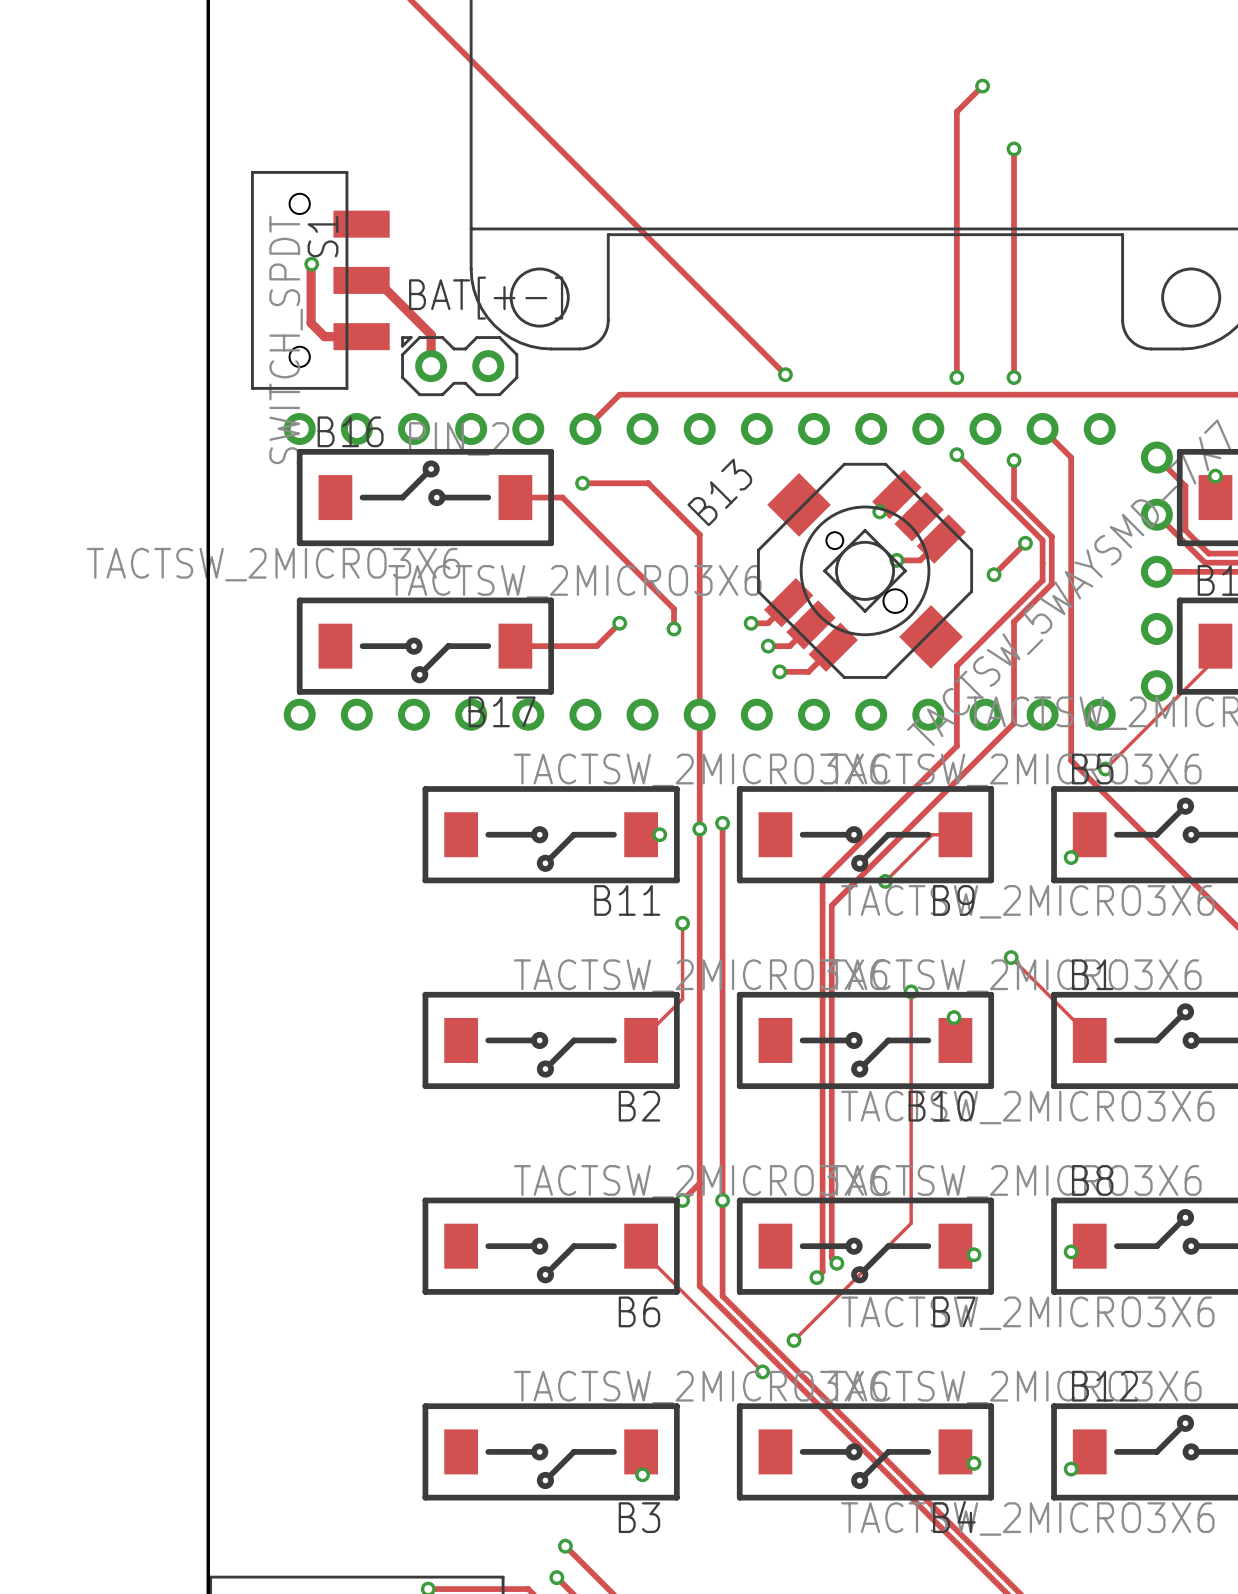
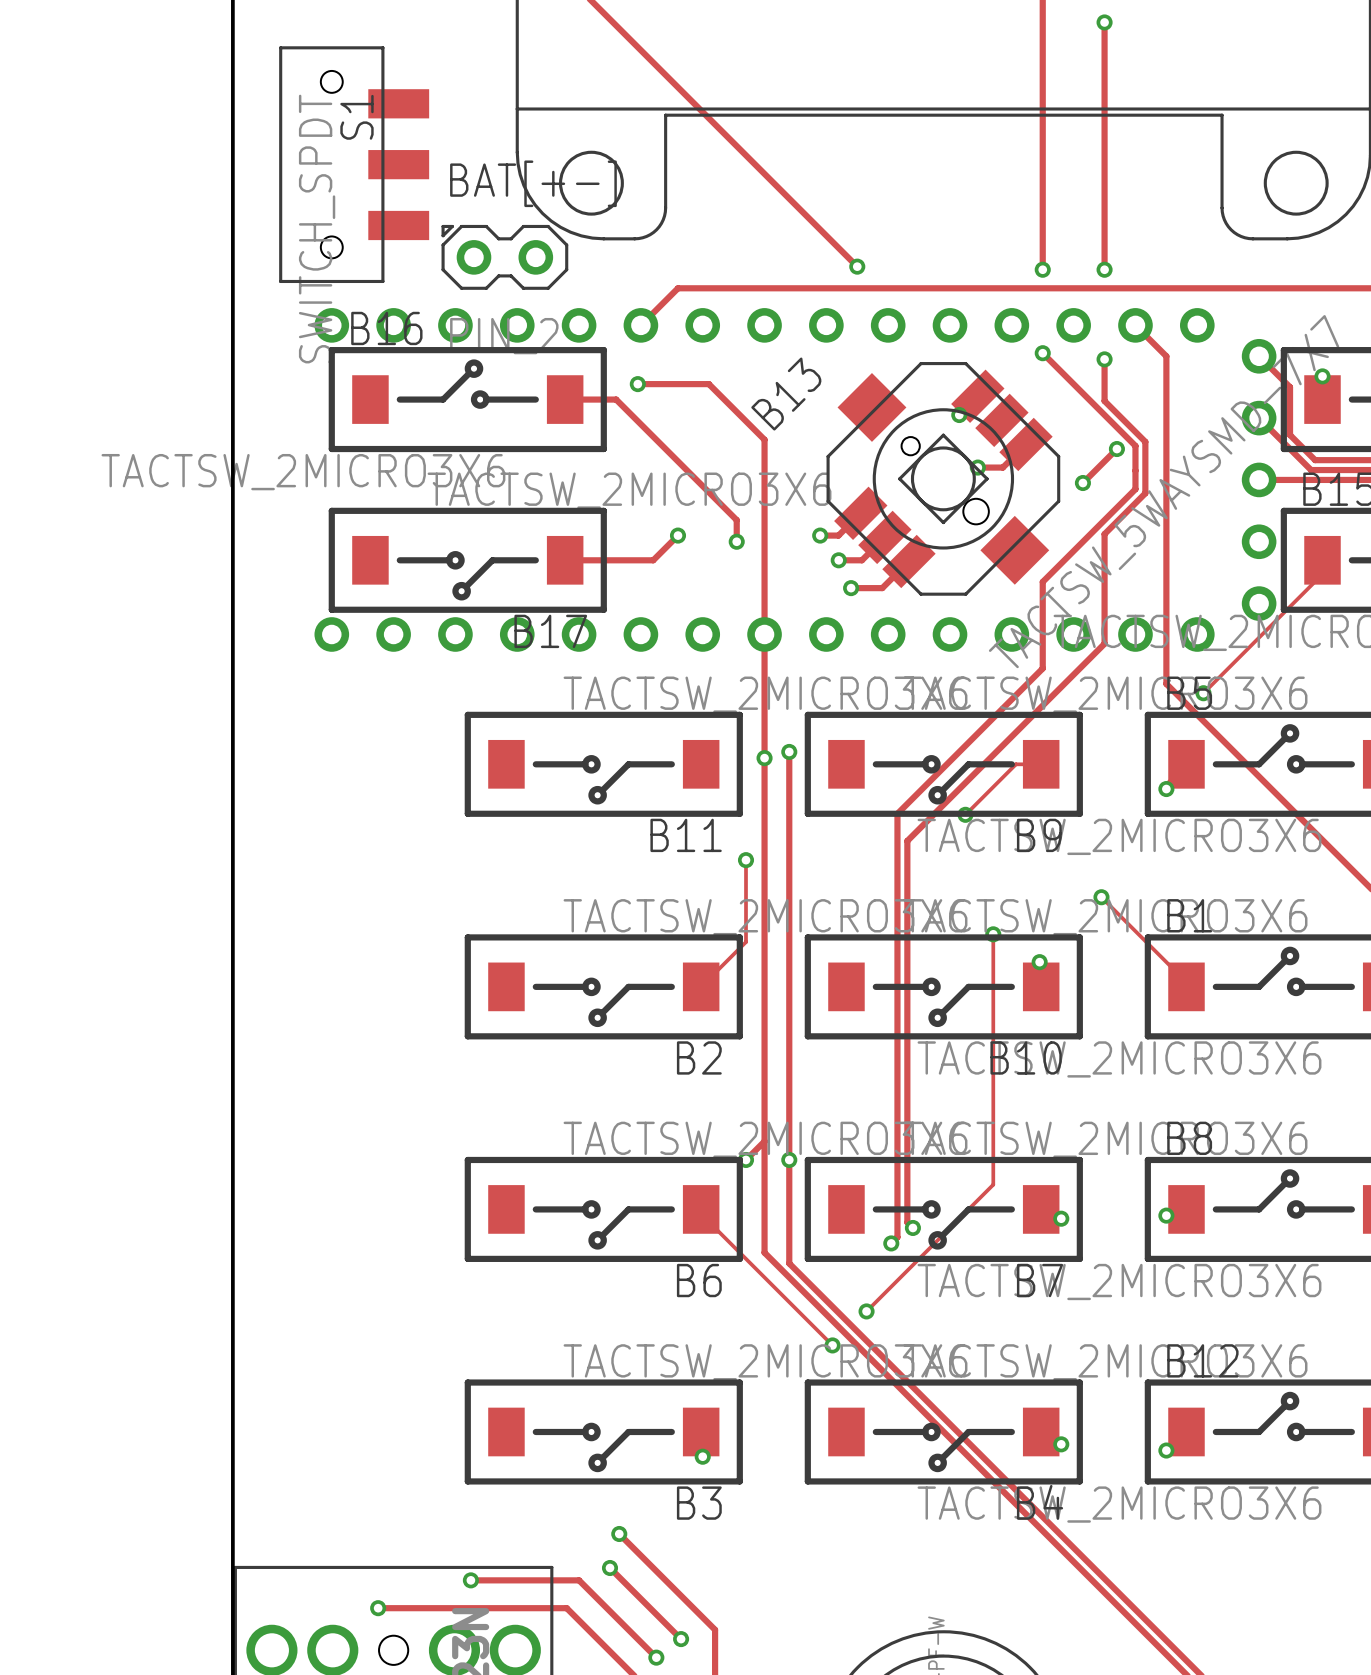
track: (311, 264) (311, 323) (324, 336) (361, 336) -> none
via: (311, 264) -> none
track: (361, 280) (376, 280) (431, 334) (431, 366) -> none
via: (659, 834) -> none

